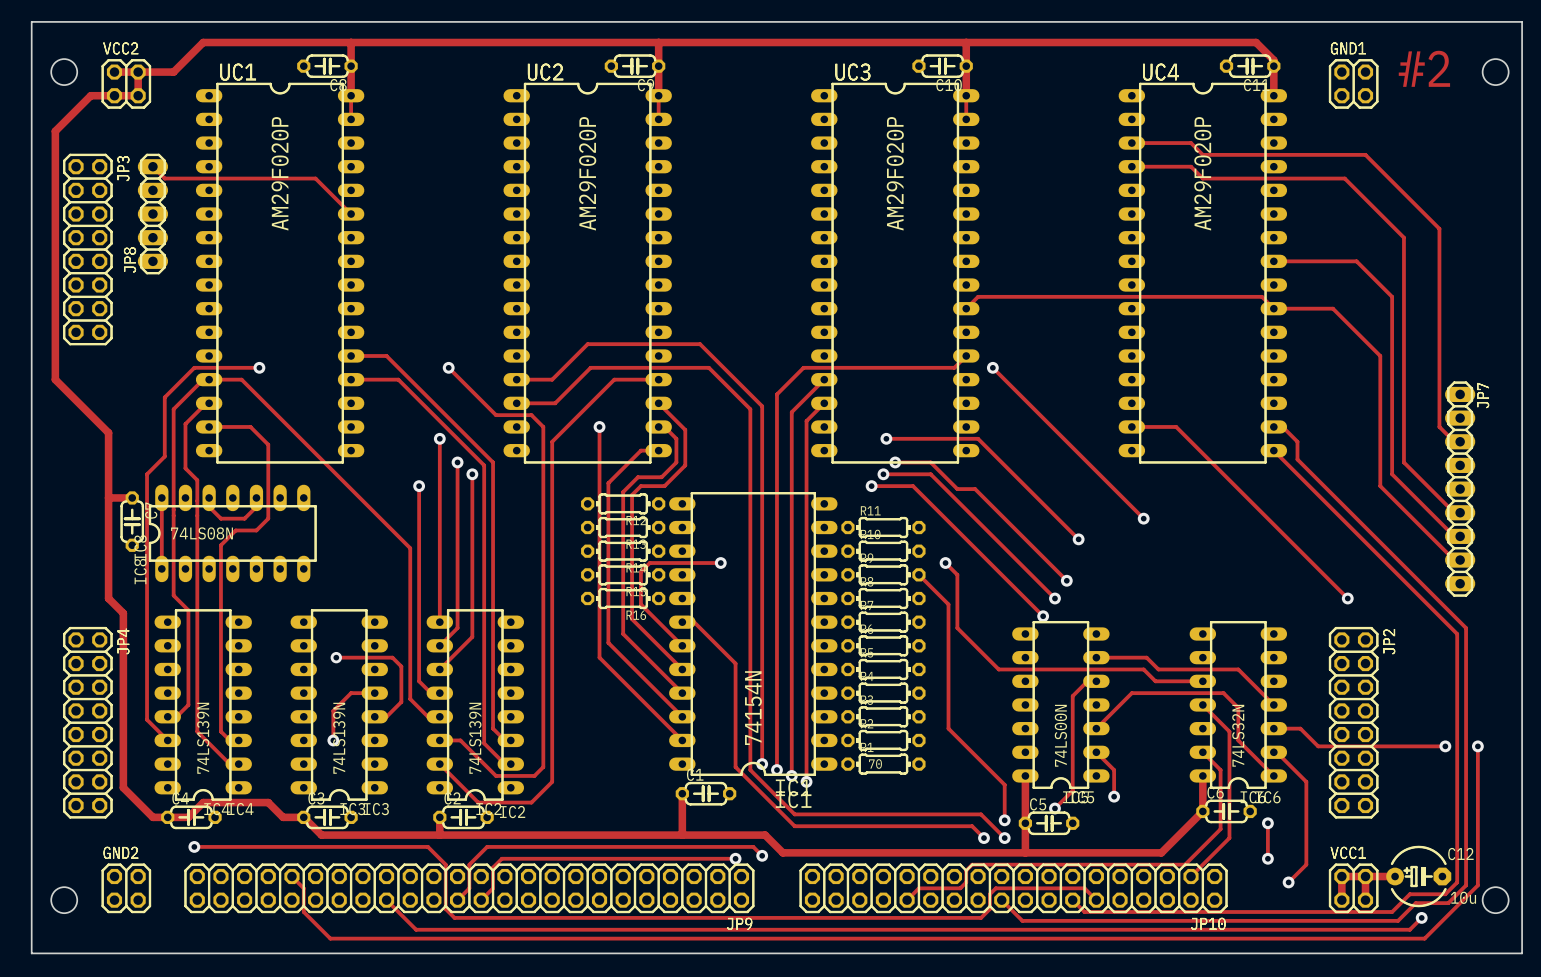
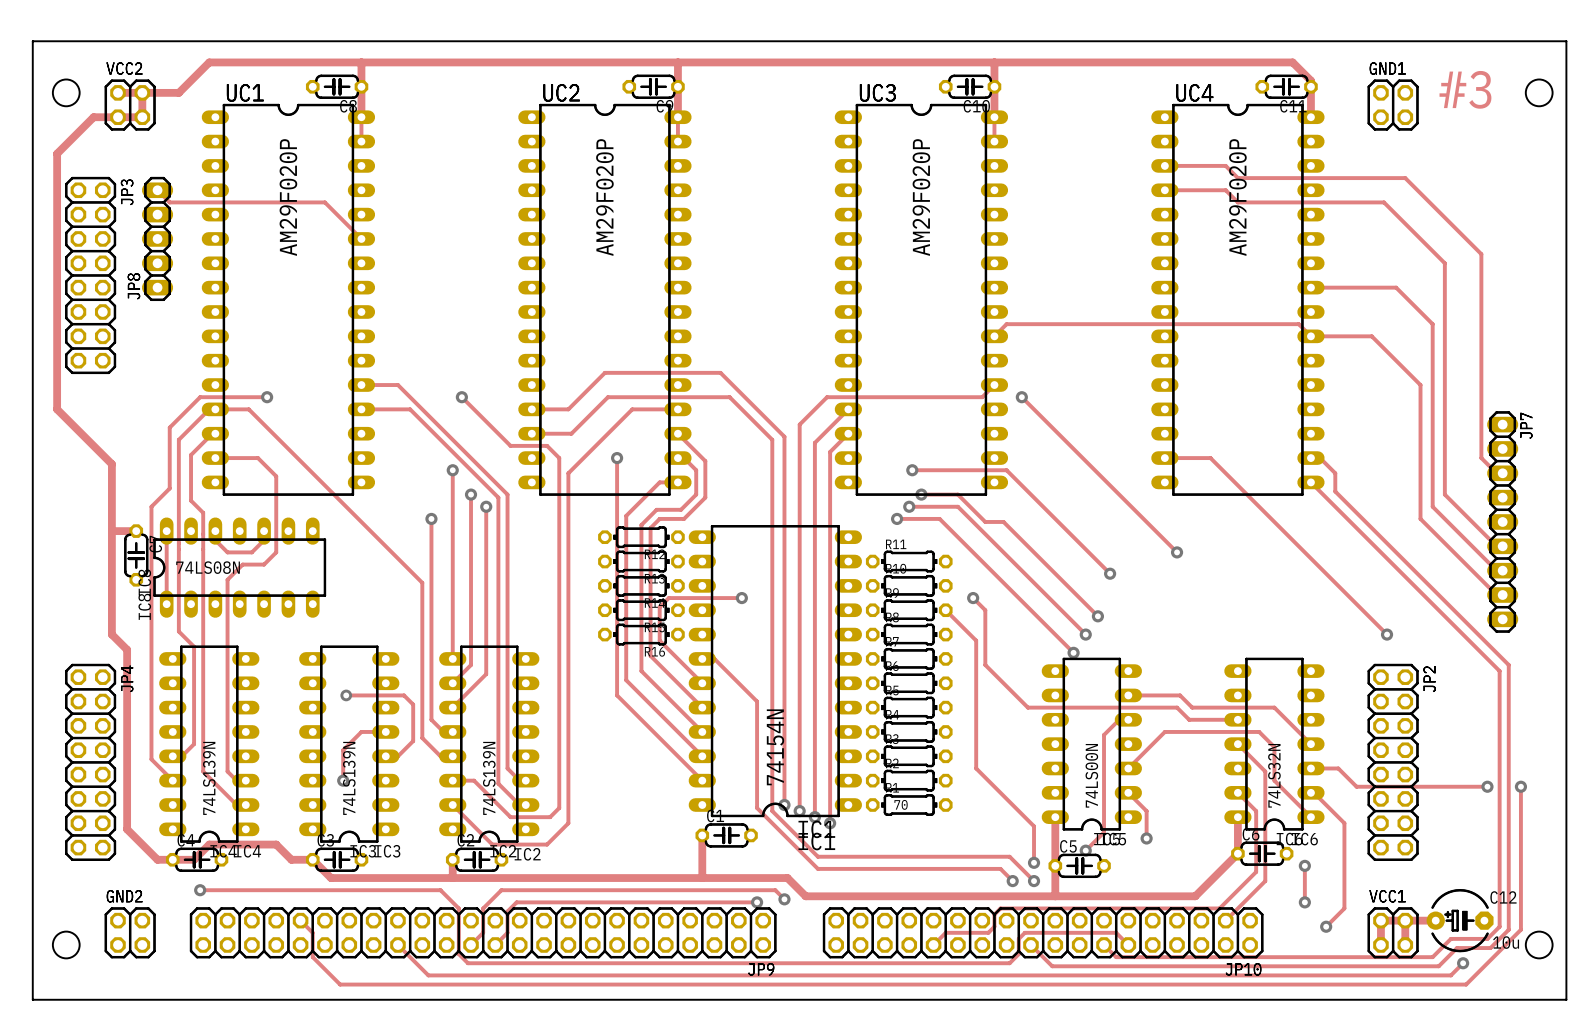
text: #2 (1424, 68) -> #3 (1465, 89)

